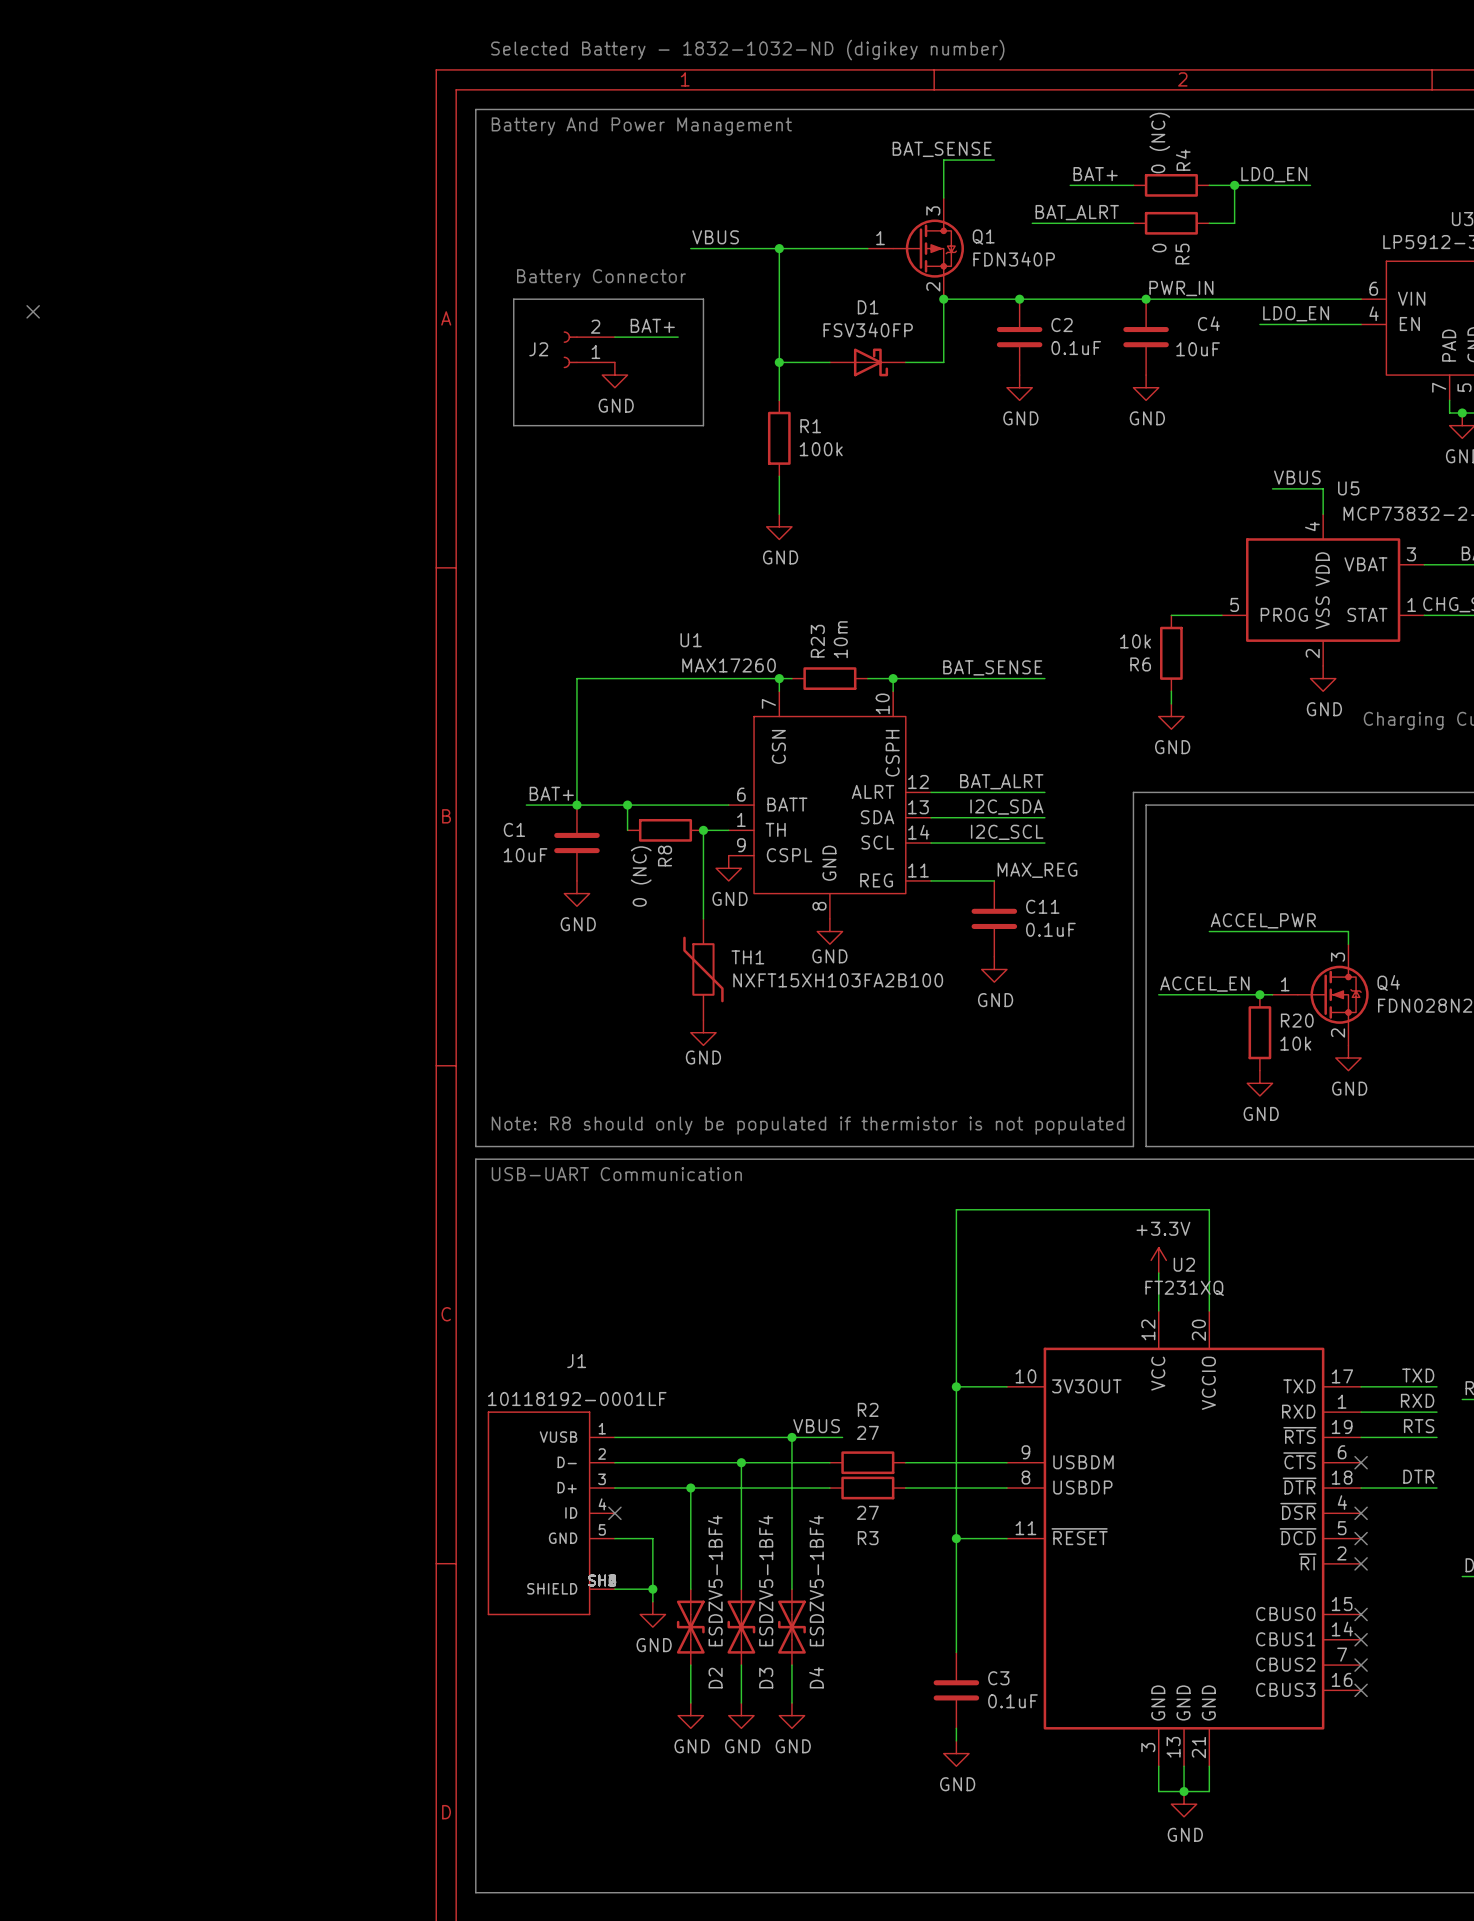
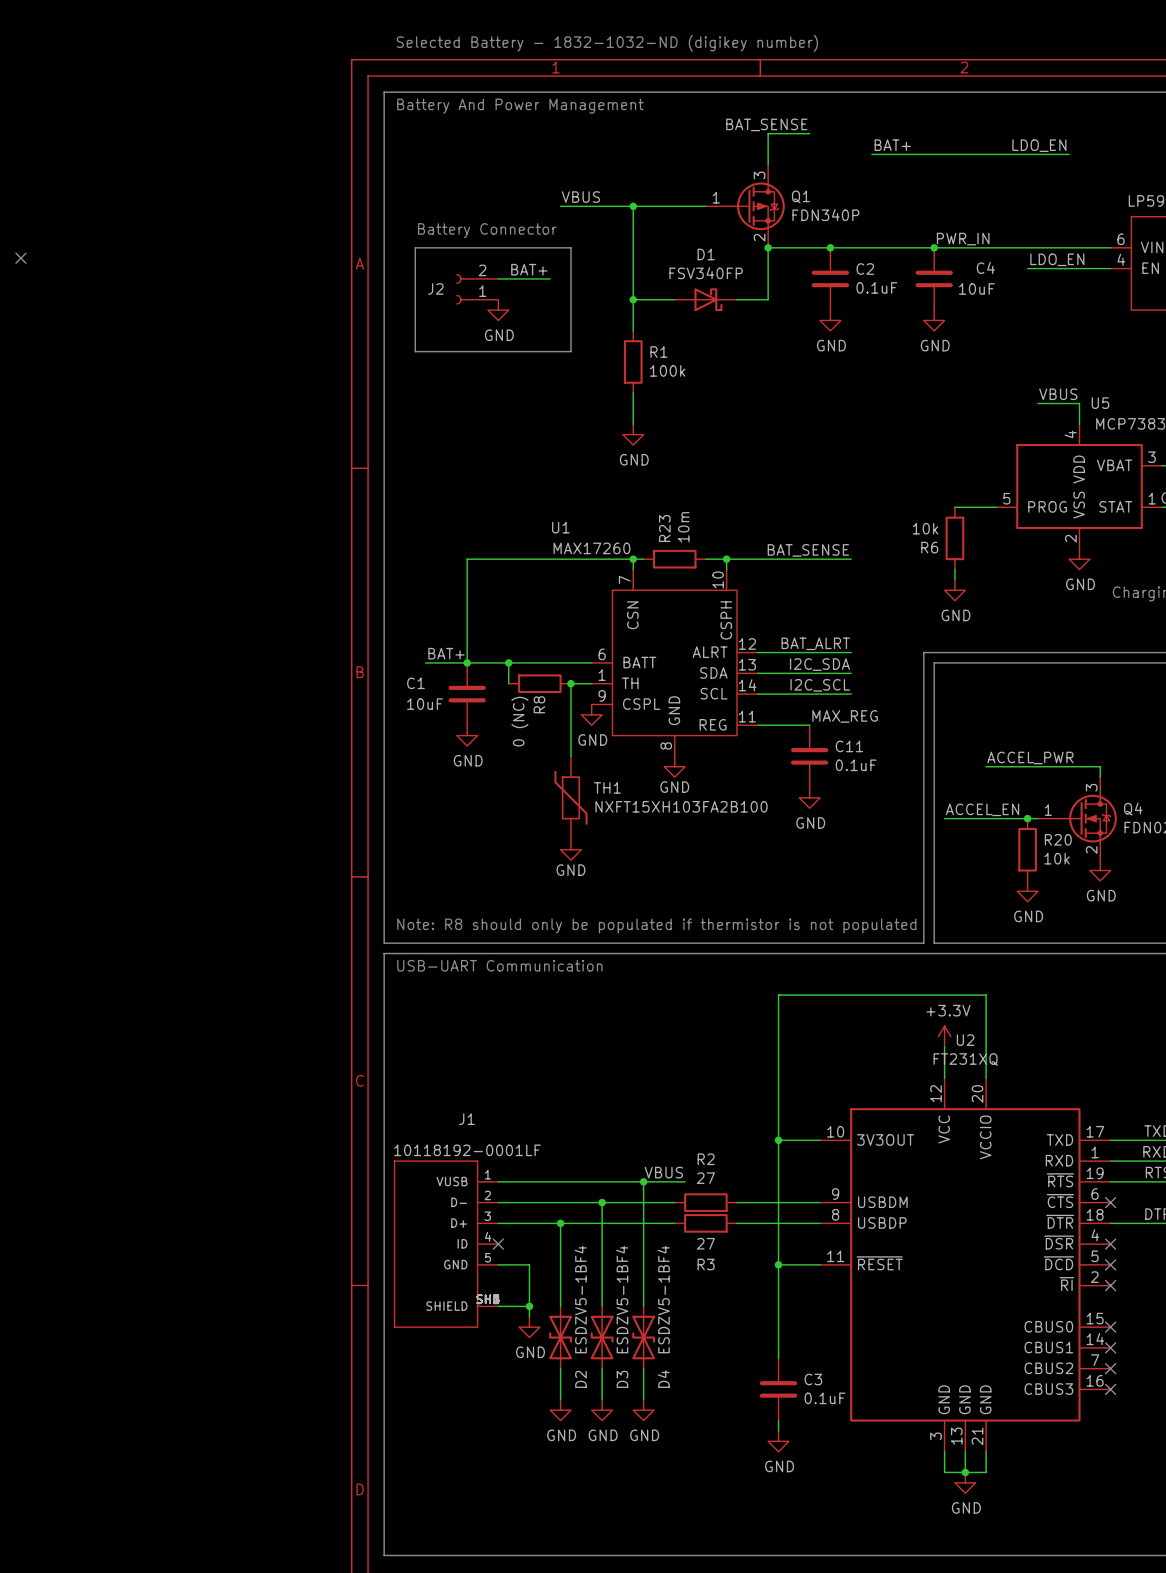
wire: none -> (923, 154) (986, 154)
R4: 0 (NC) (1171, 185) -> none
wire: (1234, 185) (1234, 223) (1209, 223) -> none
junction: (1234, 185) -> none
label: BAT_ALRT (1077, 212) -> none
wire: (1032, 223) (1133, 223) -> none
R5: 0 (1171, 223) -> none

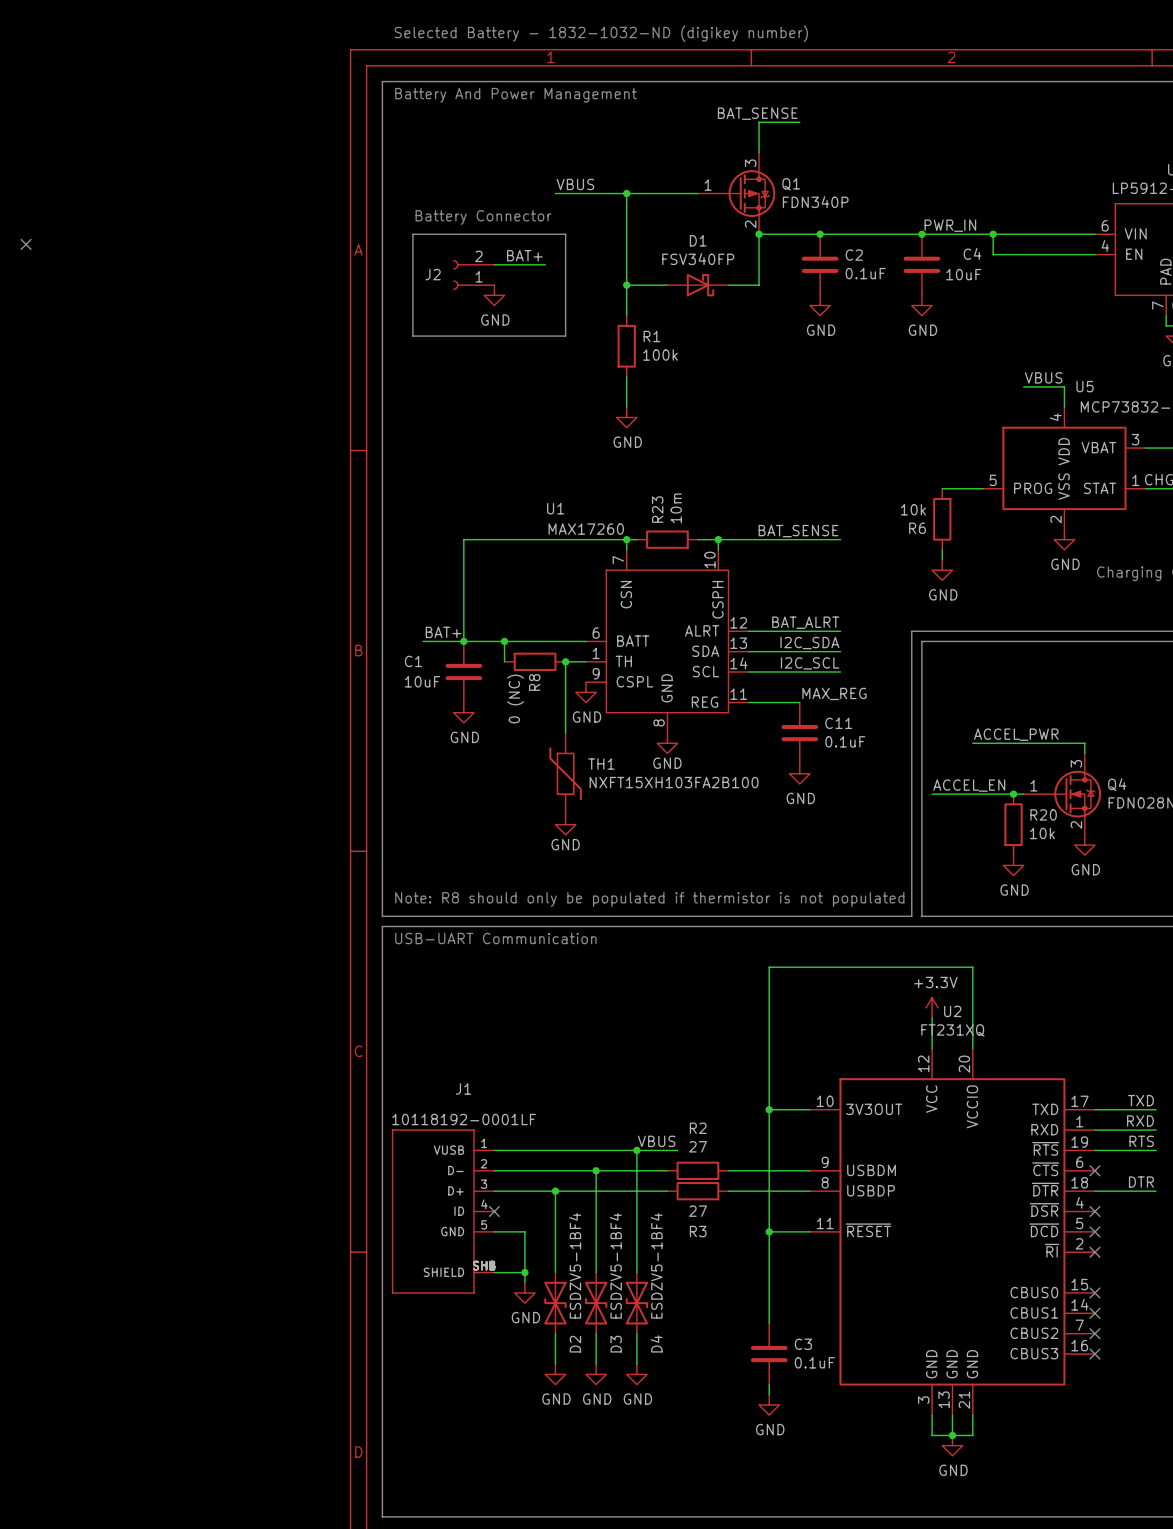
label: BAT+ (892, 145) -> none
label: LDO_EN (1039, 145) -> none
wire: (871, 154) (1069, 154) -> none
wire: none -> (993, 234) (993, 254) (1013, 254)
junction: none -> (993, 234)
label: LDO_EN (1057, 259) -> none

